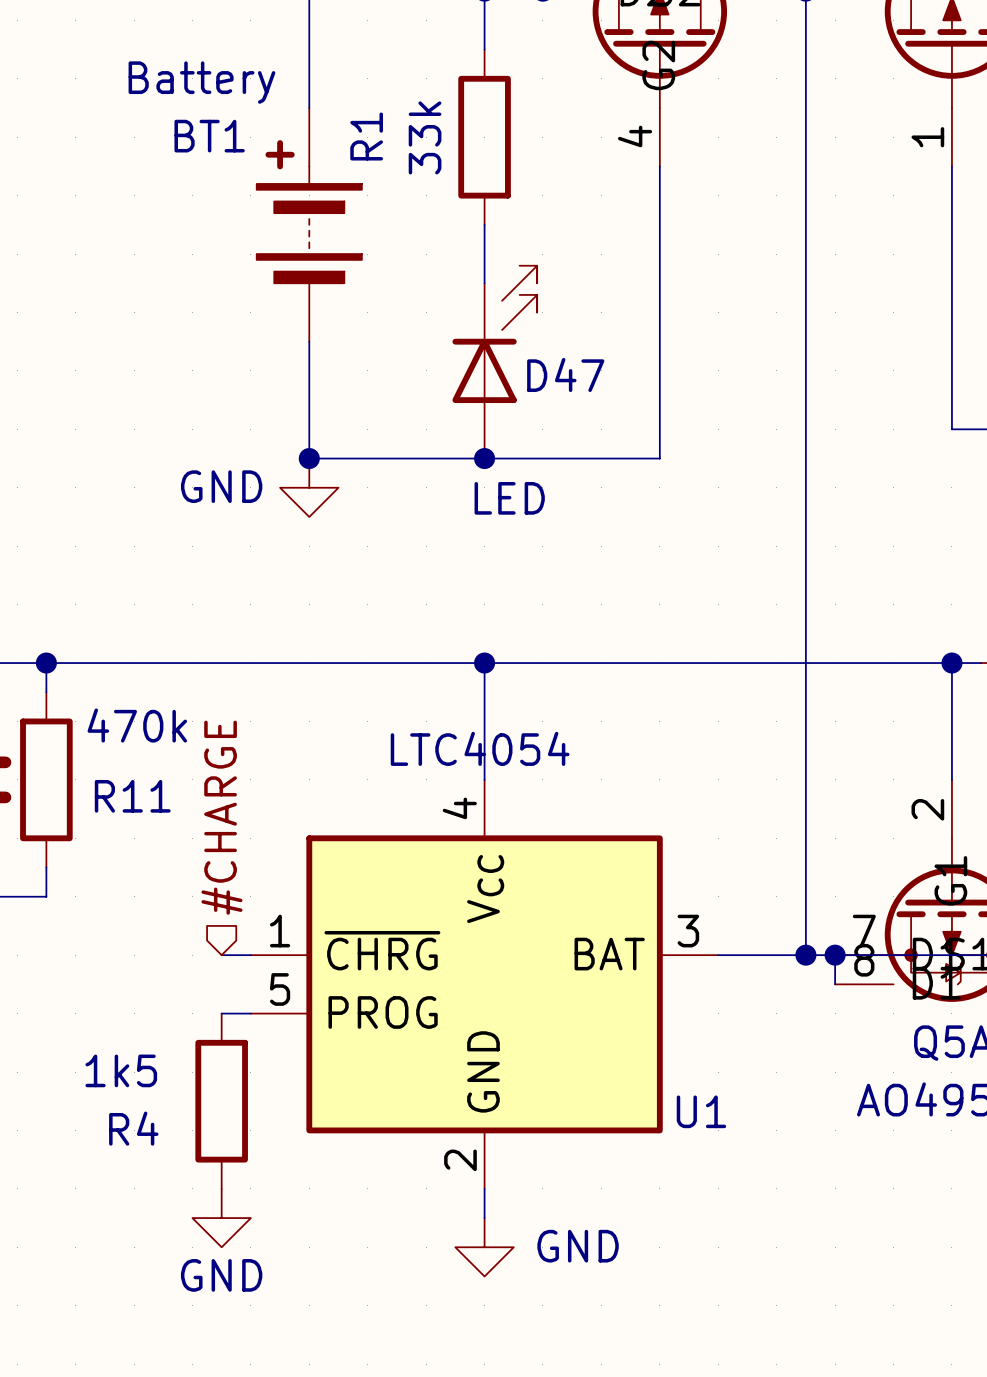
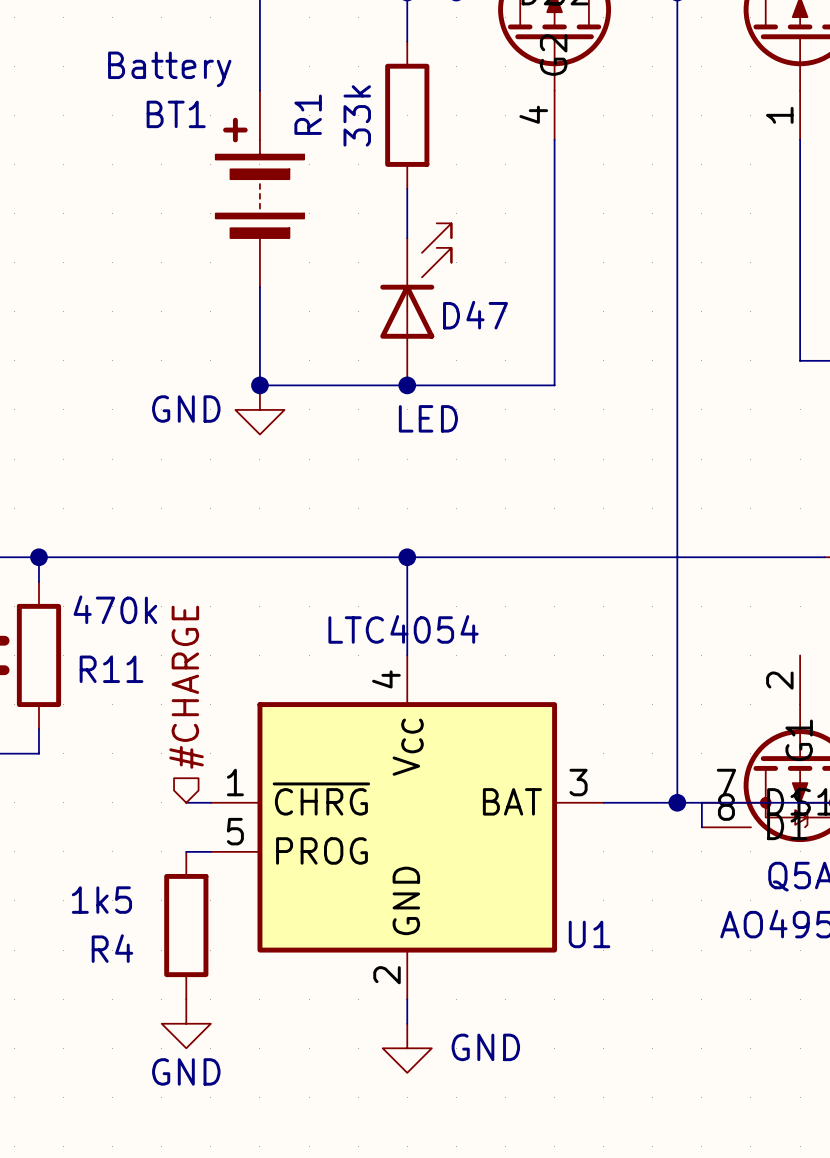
wire: (951, 663) (951, 779) -> none
junction: (951, 663) -> none
junction: (835, 955) -> none

